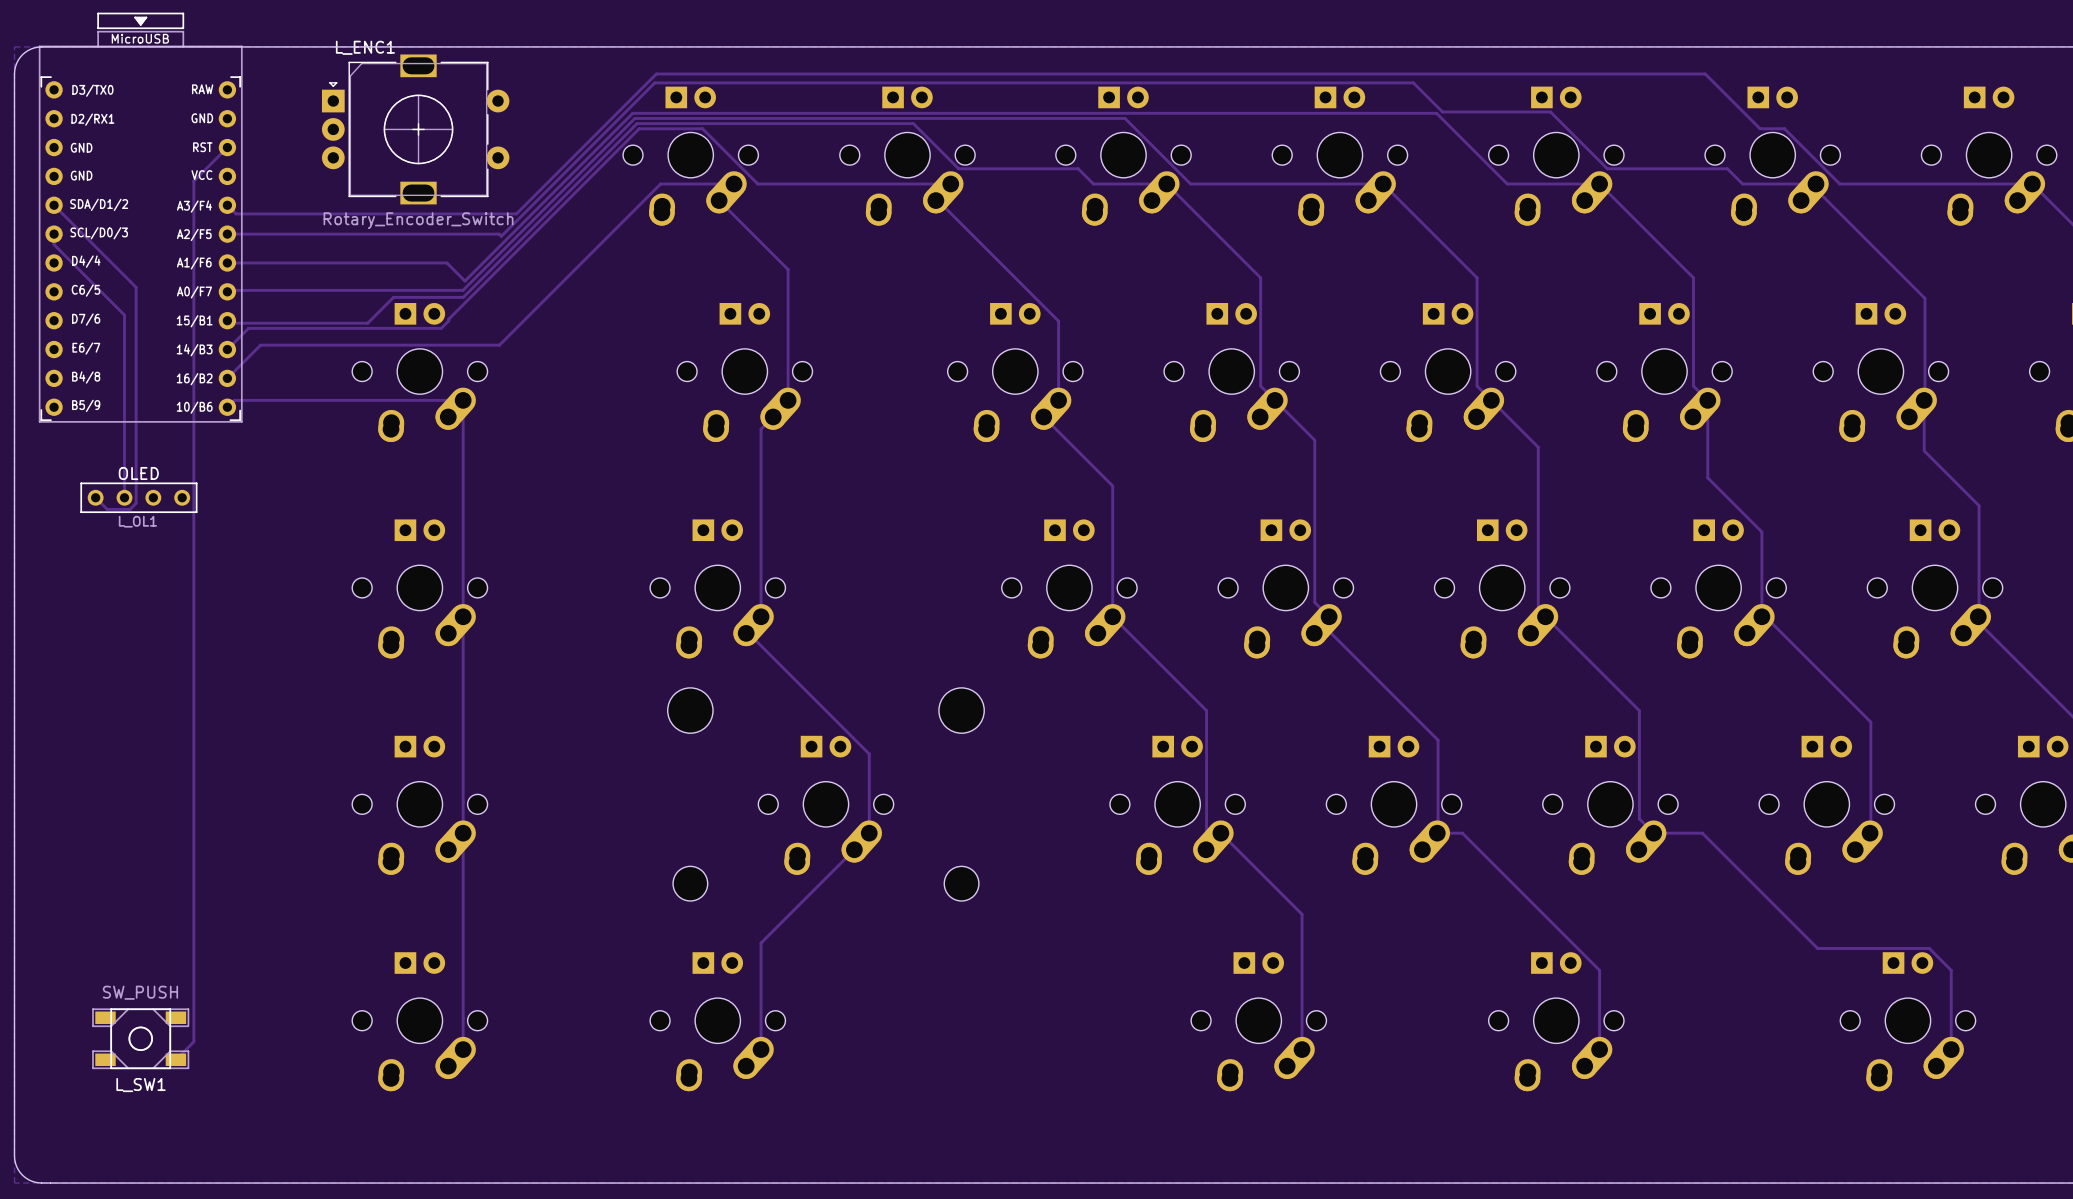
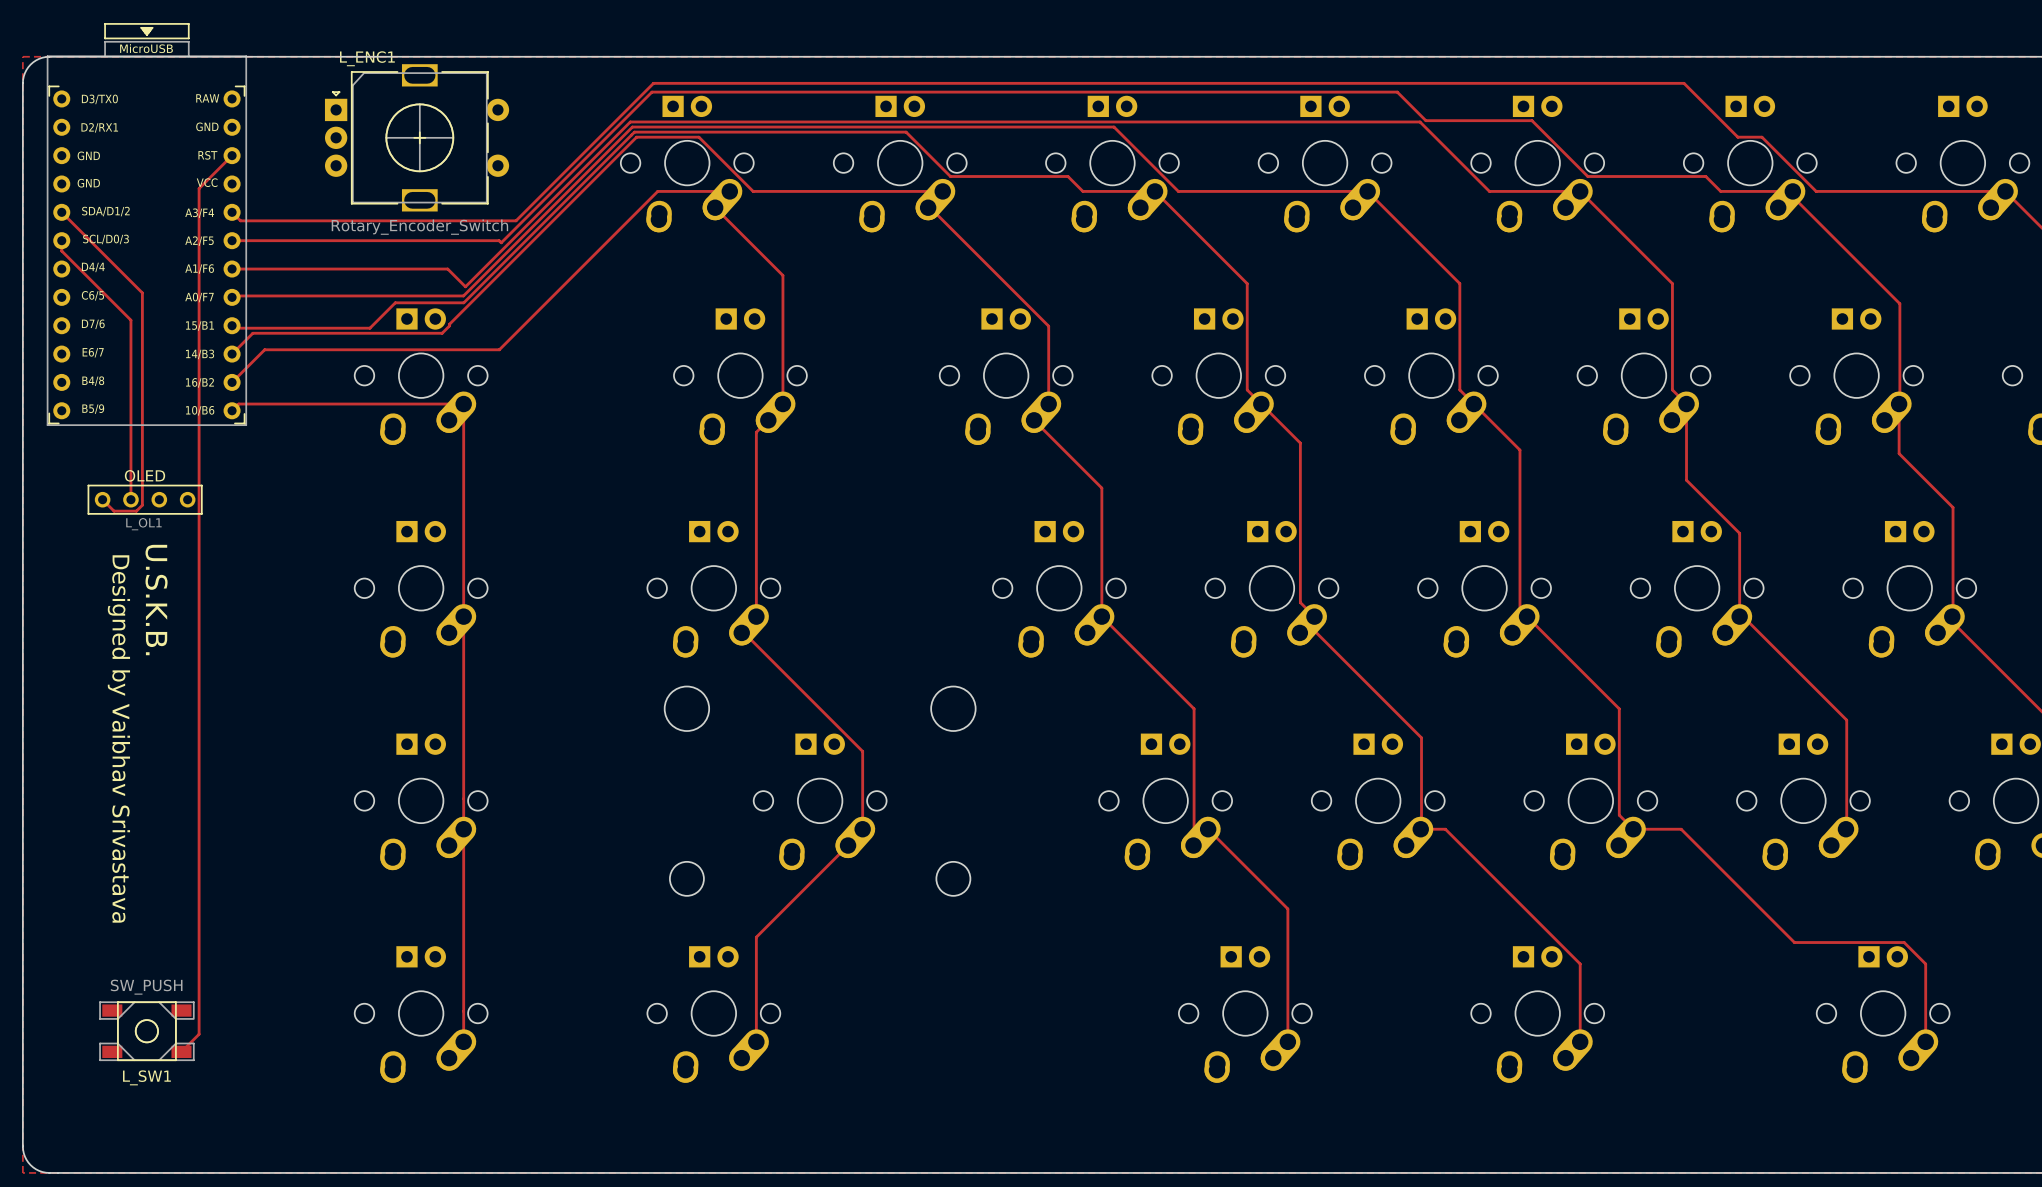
text: none -> U.S.K.B. (156, 600)
text: none -> Designed by Vaibhav Srivastava (118, 738)

